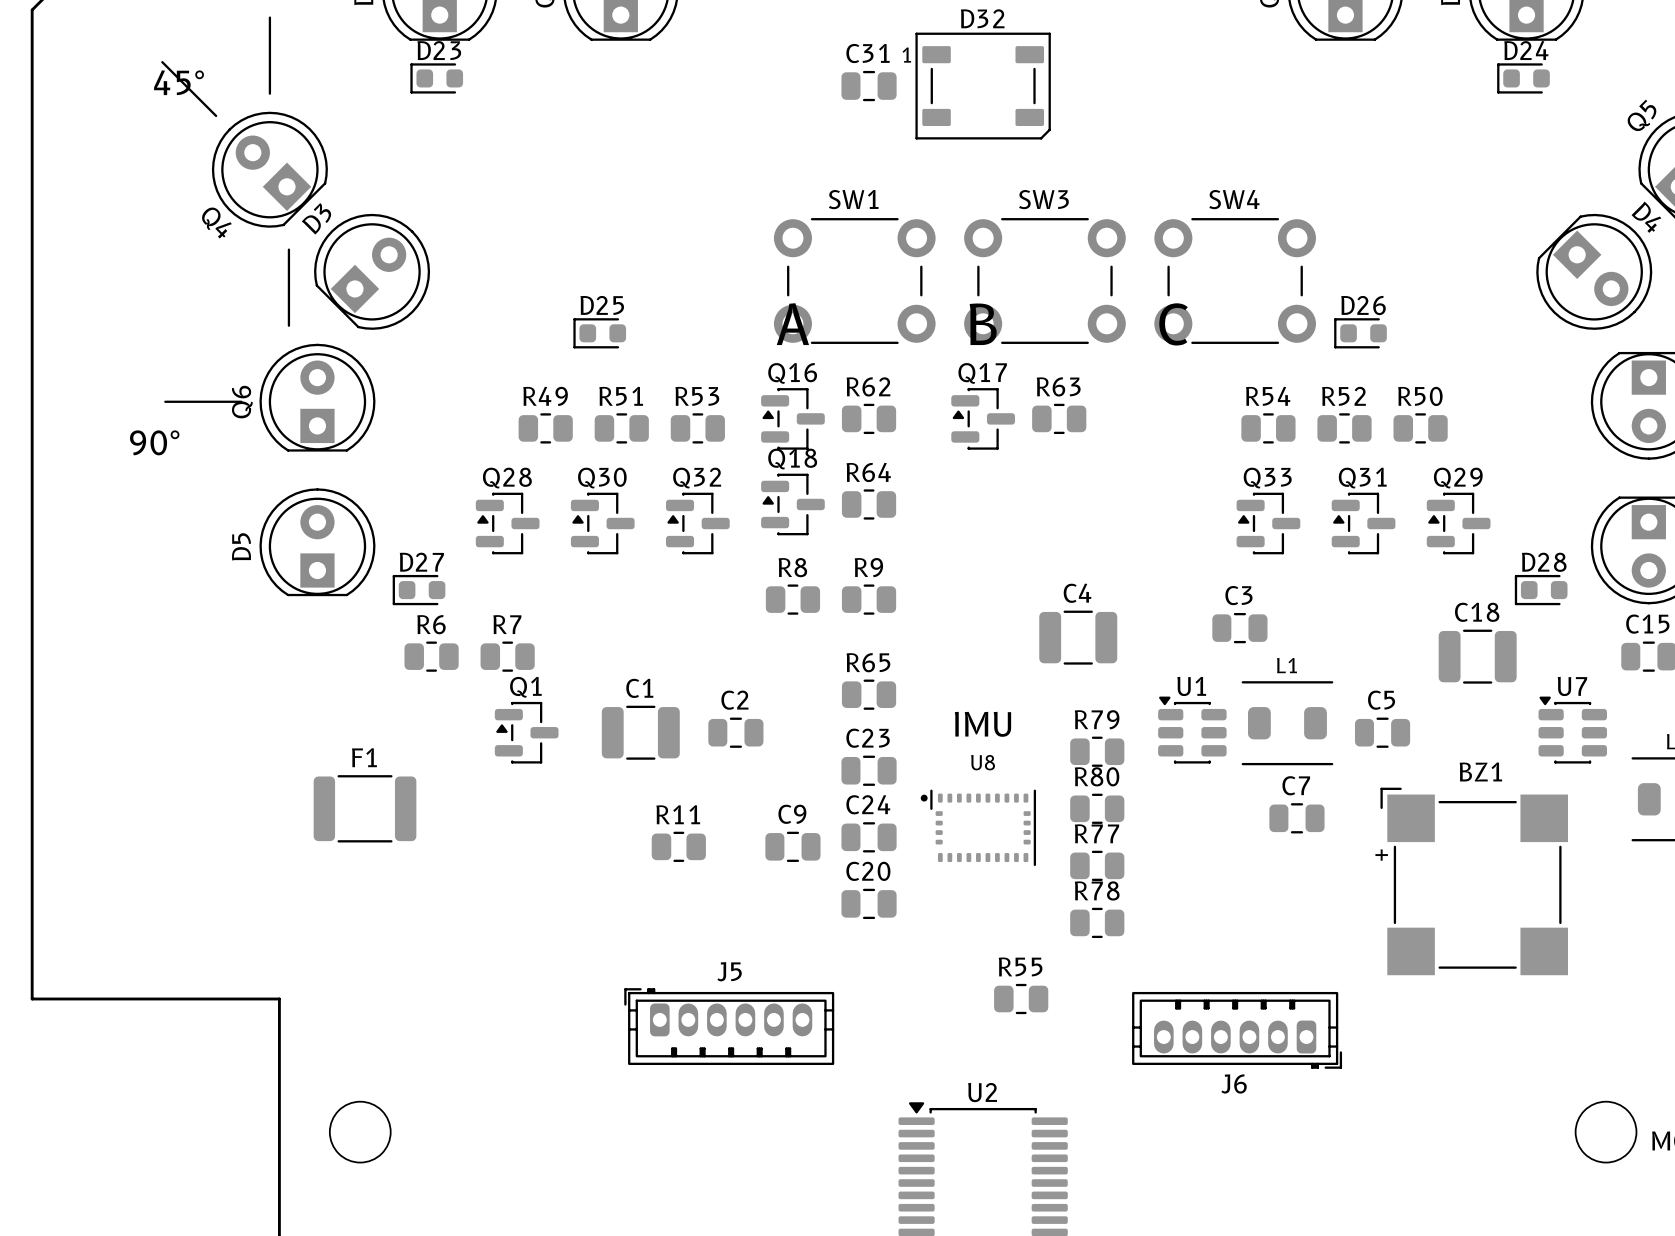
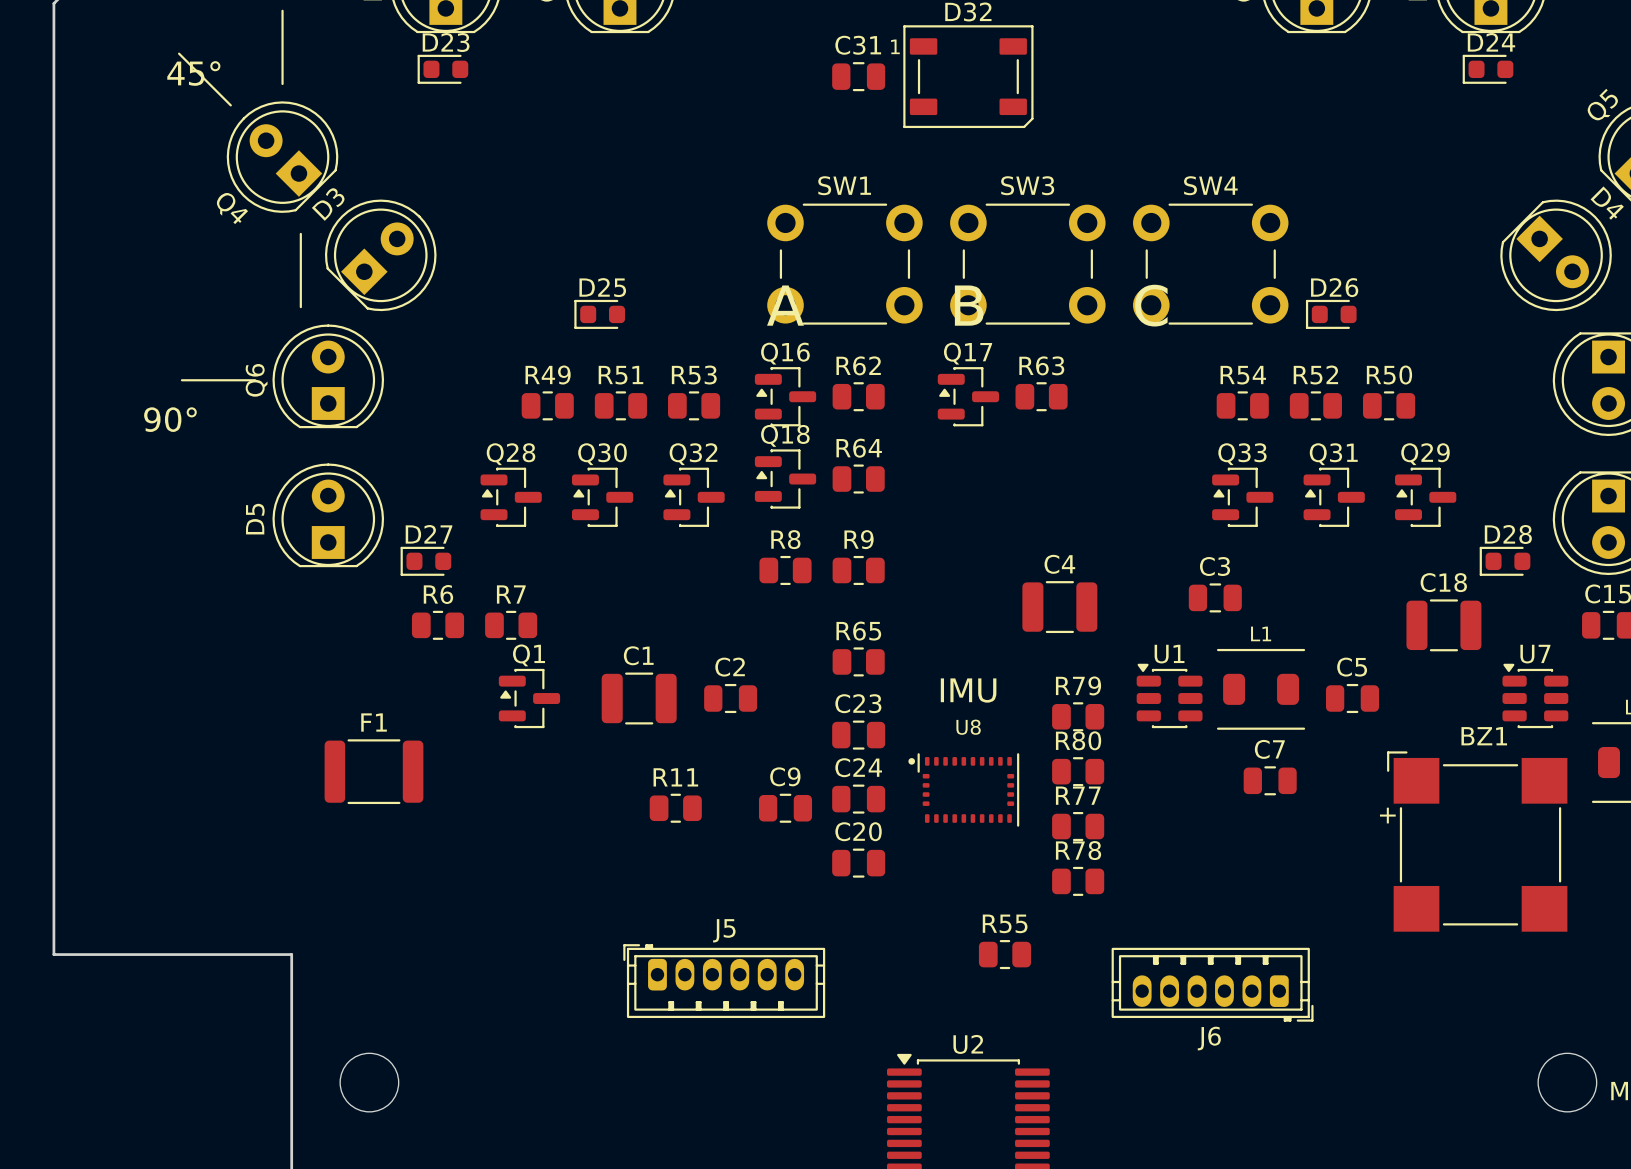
BZ1 position: (1474, 881) -> (1477, 841)

